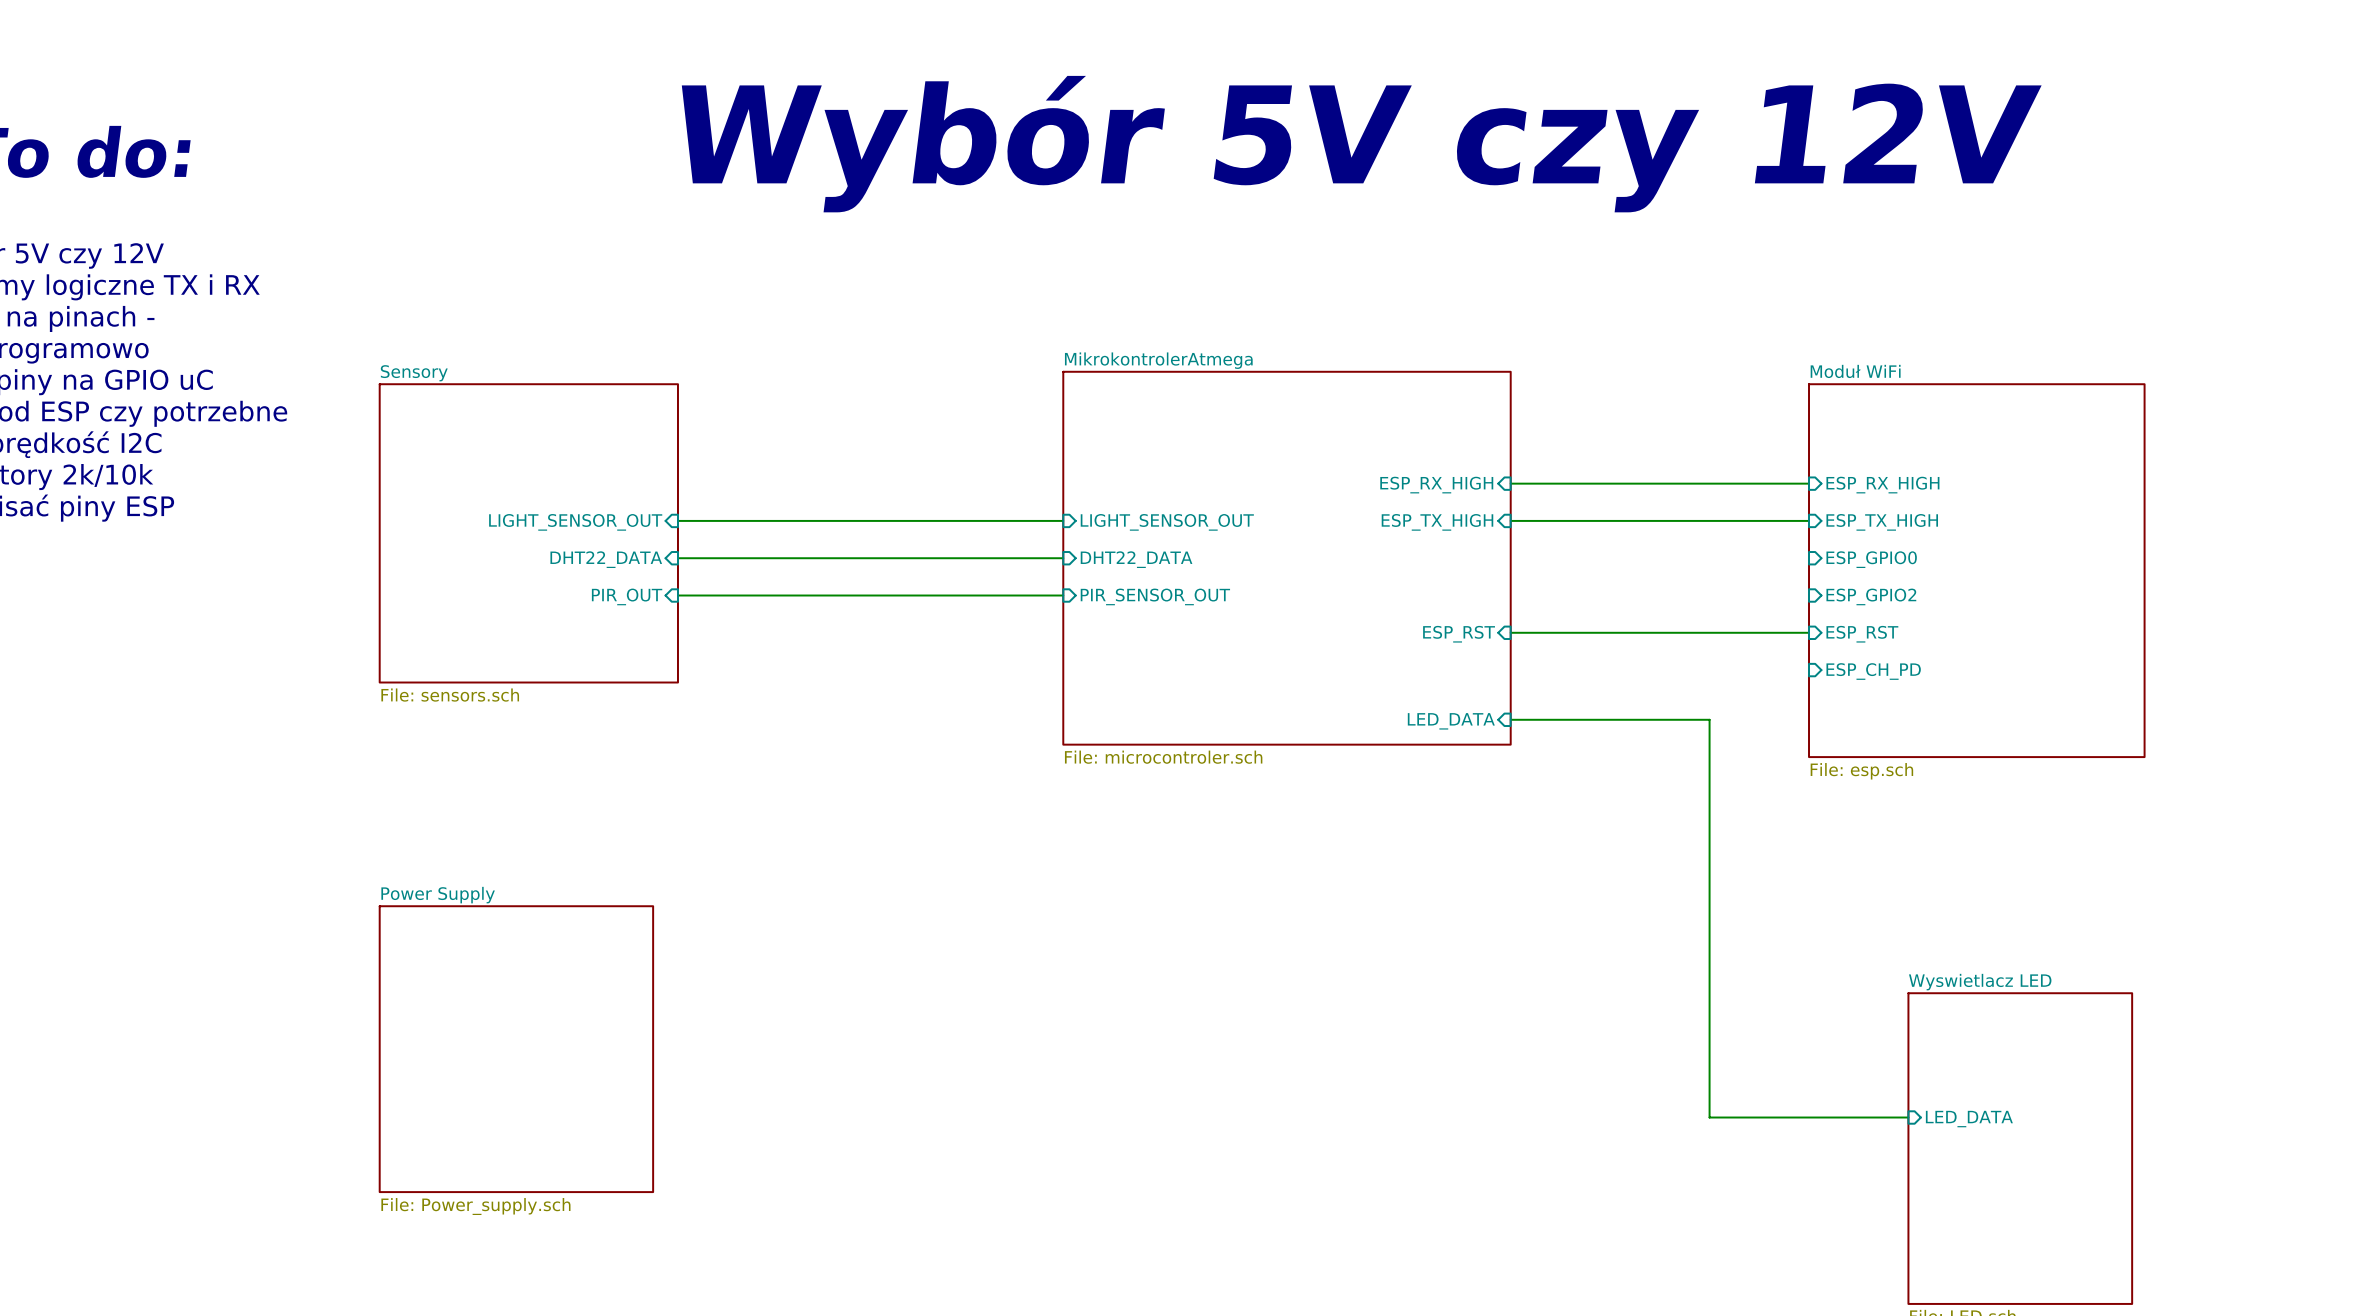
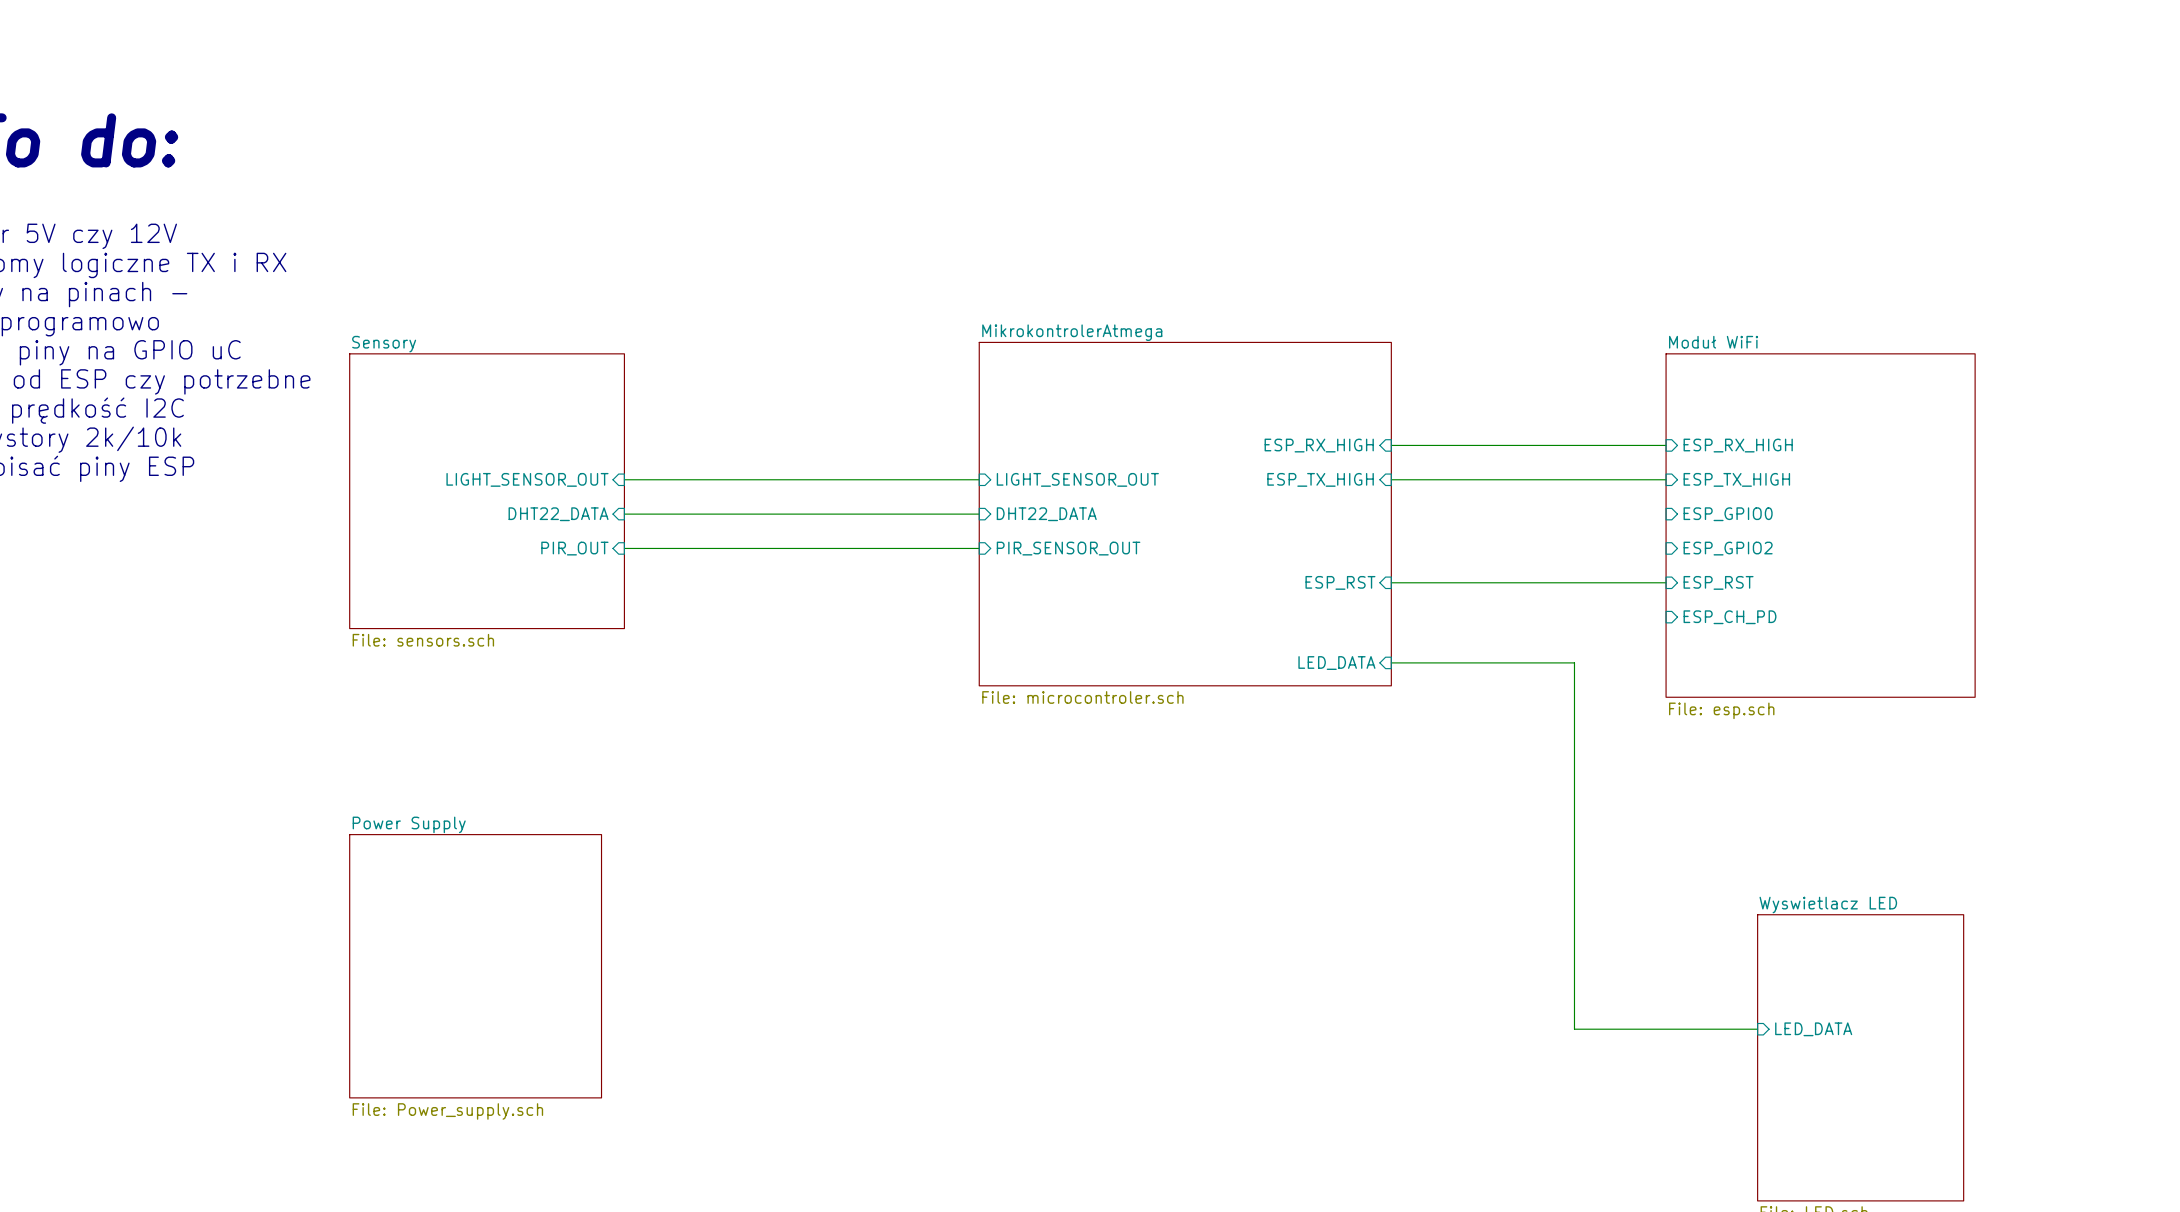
text: Wybór 5V czy 12V (1361, 144) -> none

